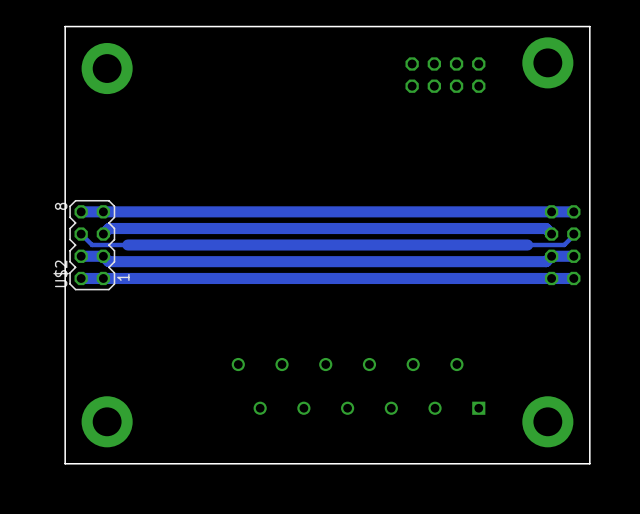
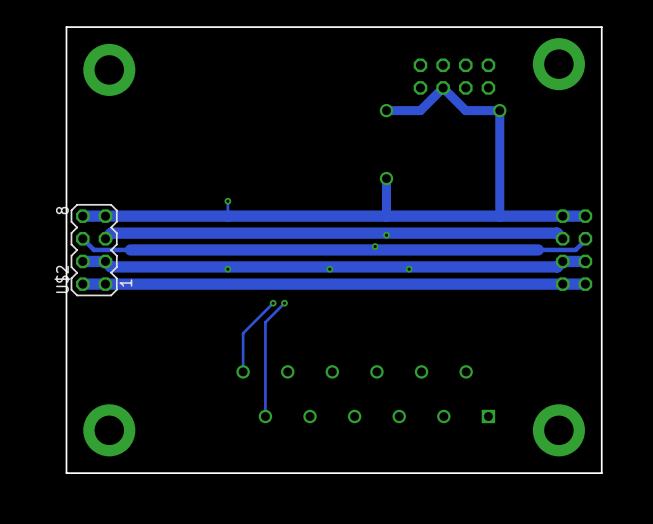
track: none -> (386, 110) (420, 110) (443, 87) (465, 110) (499, 110) (499, 216)
via: none -> (386, 110)
via: none -> (499, 110)
track: none -> (386, 178) (386, 216)
via: none -> (386, 178)
track: none -> (227, 201) (227, 216)
via: none -> (227, 201)
via: none -> (386, 235)
via: none -> (375, 246)
via: none -> (227, 269)
via: none -> (329, 269)
via: none -> (409, 269)
track: none -> (273, 303) (243, 333) (243, 371)
via: none -> (273, 303)
track: none -> (284, 303) (265, 322) (265, 416)
via: none -> (284, 303)

